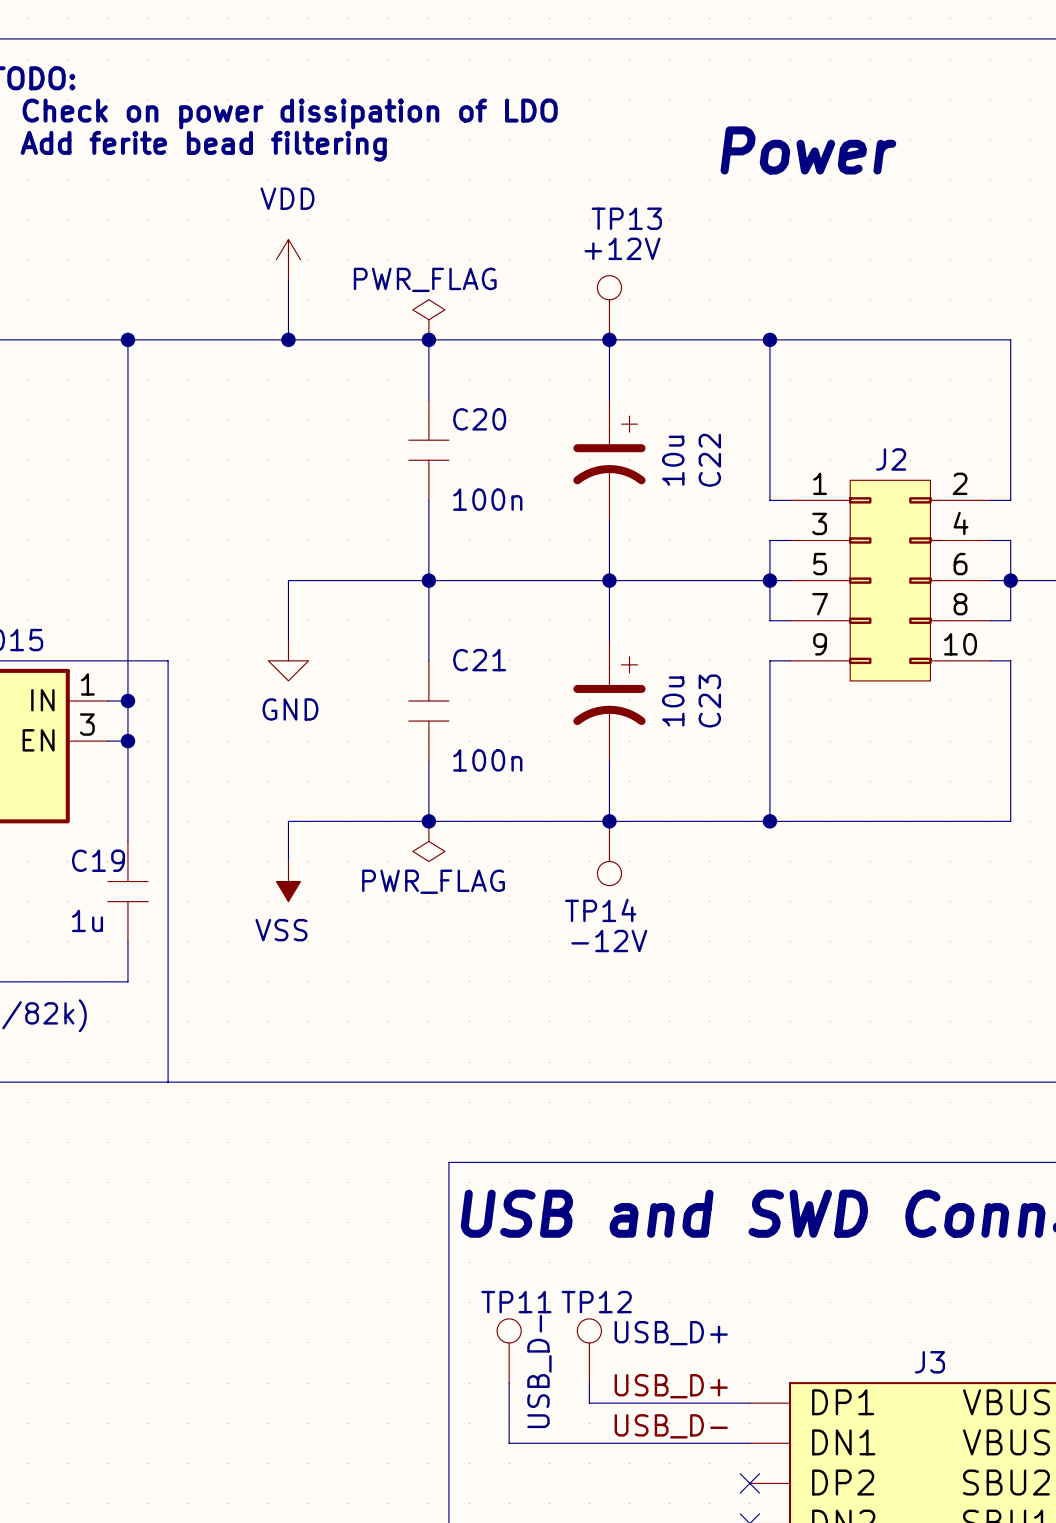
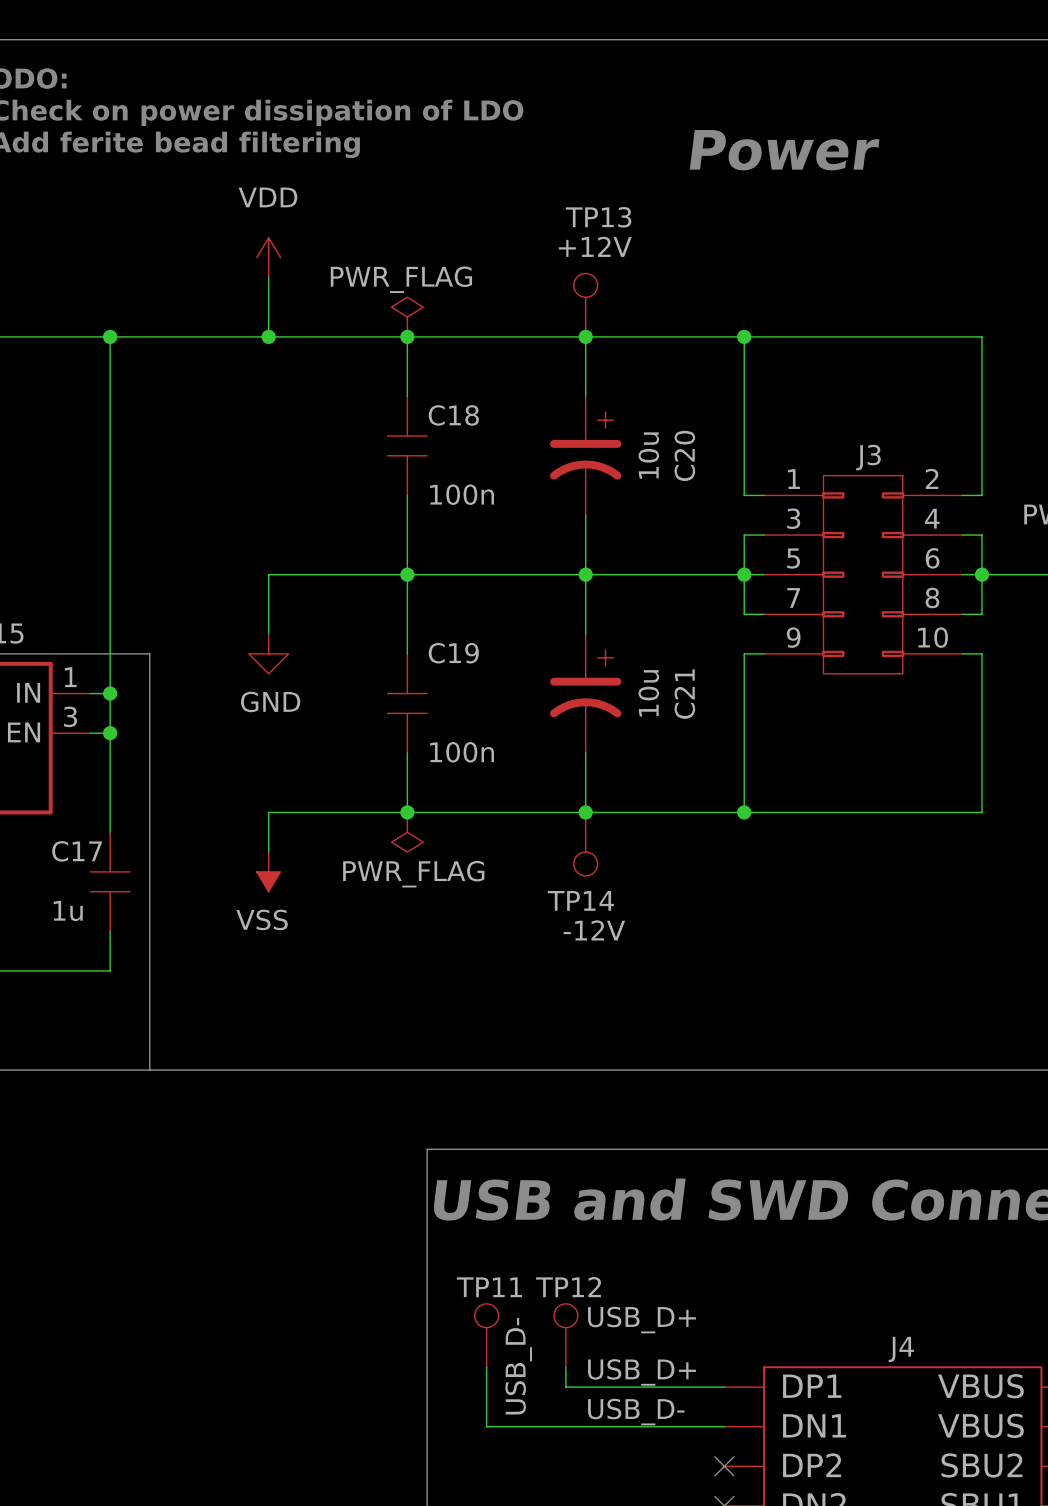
C20 name: C20 (479, 419) -> C18 (453, 415)
J2 name: J2 (891, 459) -> J3 (868, 457)
C22 name: C22 (709, 460) -> C20 (684, 455)
C21 name: C21 (479, 660) -> C19 (453, 653)
C23 name: C23 (709, 700) -> C21 (684, 694)
C19 name: C19 (98, 860) -> C17 (77, 851)
J3 name: J3 (929, 1362) -> J4 (901, 1349)

